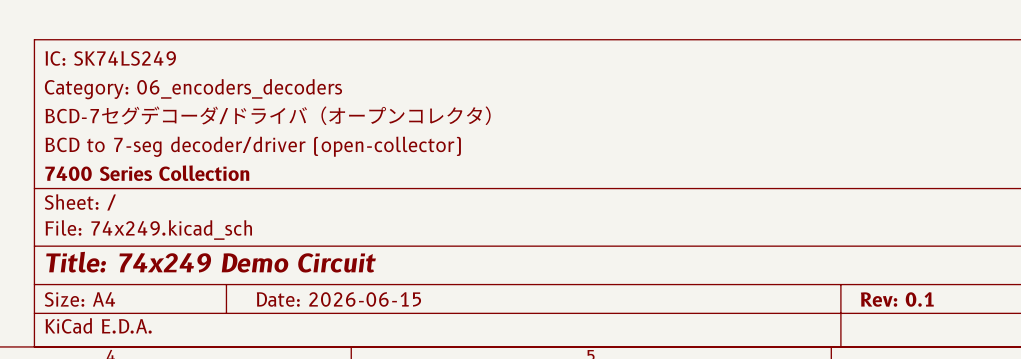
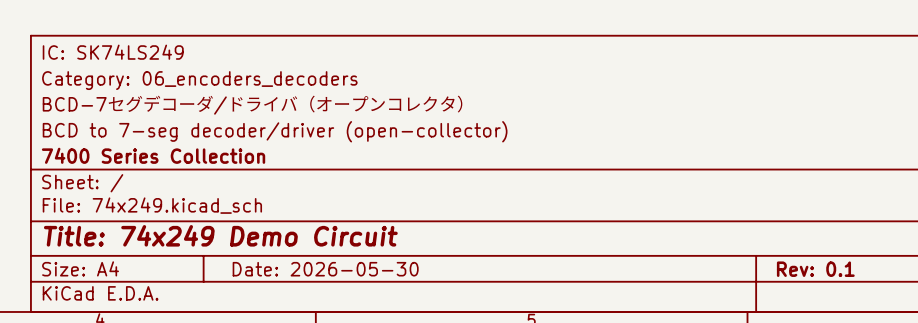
title block: Date: 2026-06-15 (338, 299) -> Date: 2026-05-30 (325, 269)

